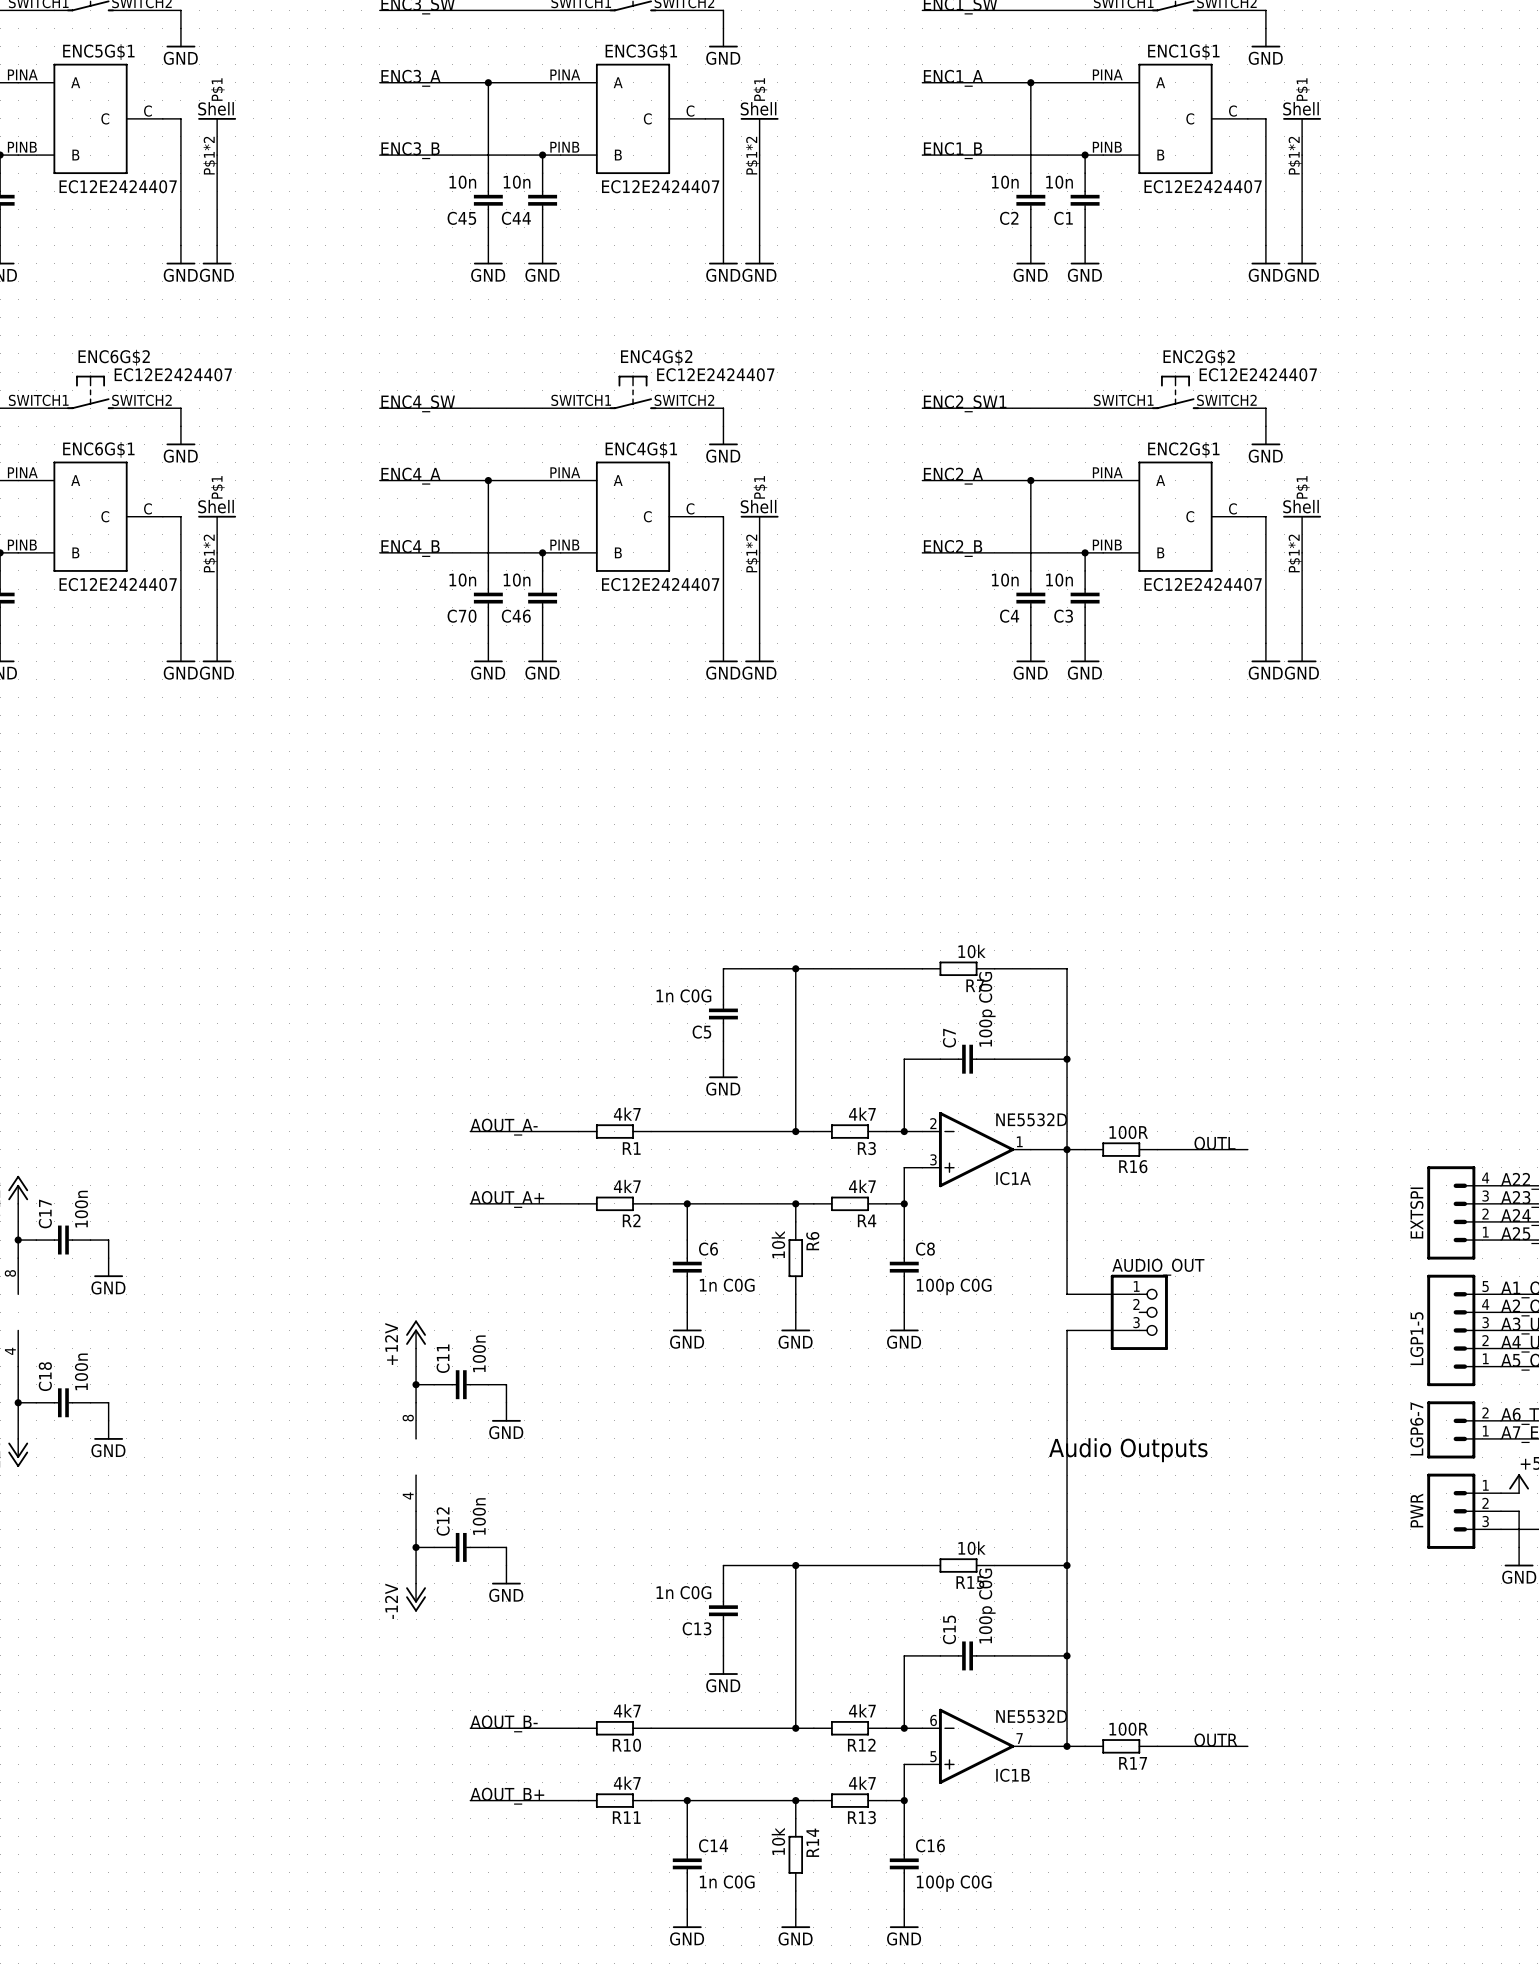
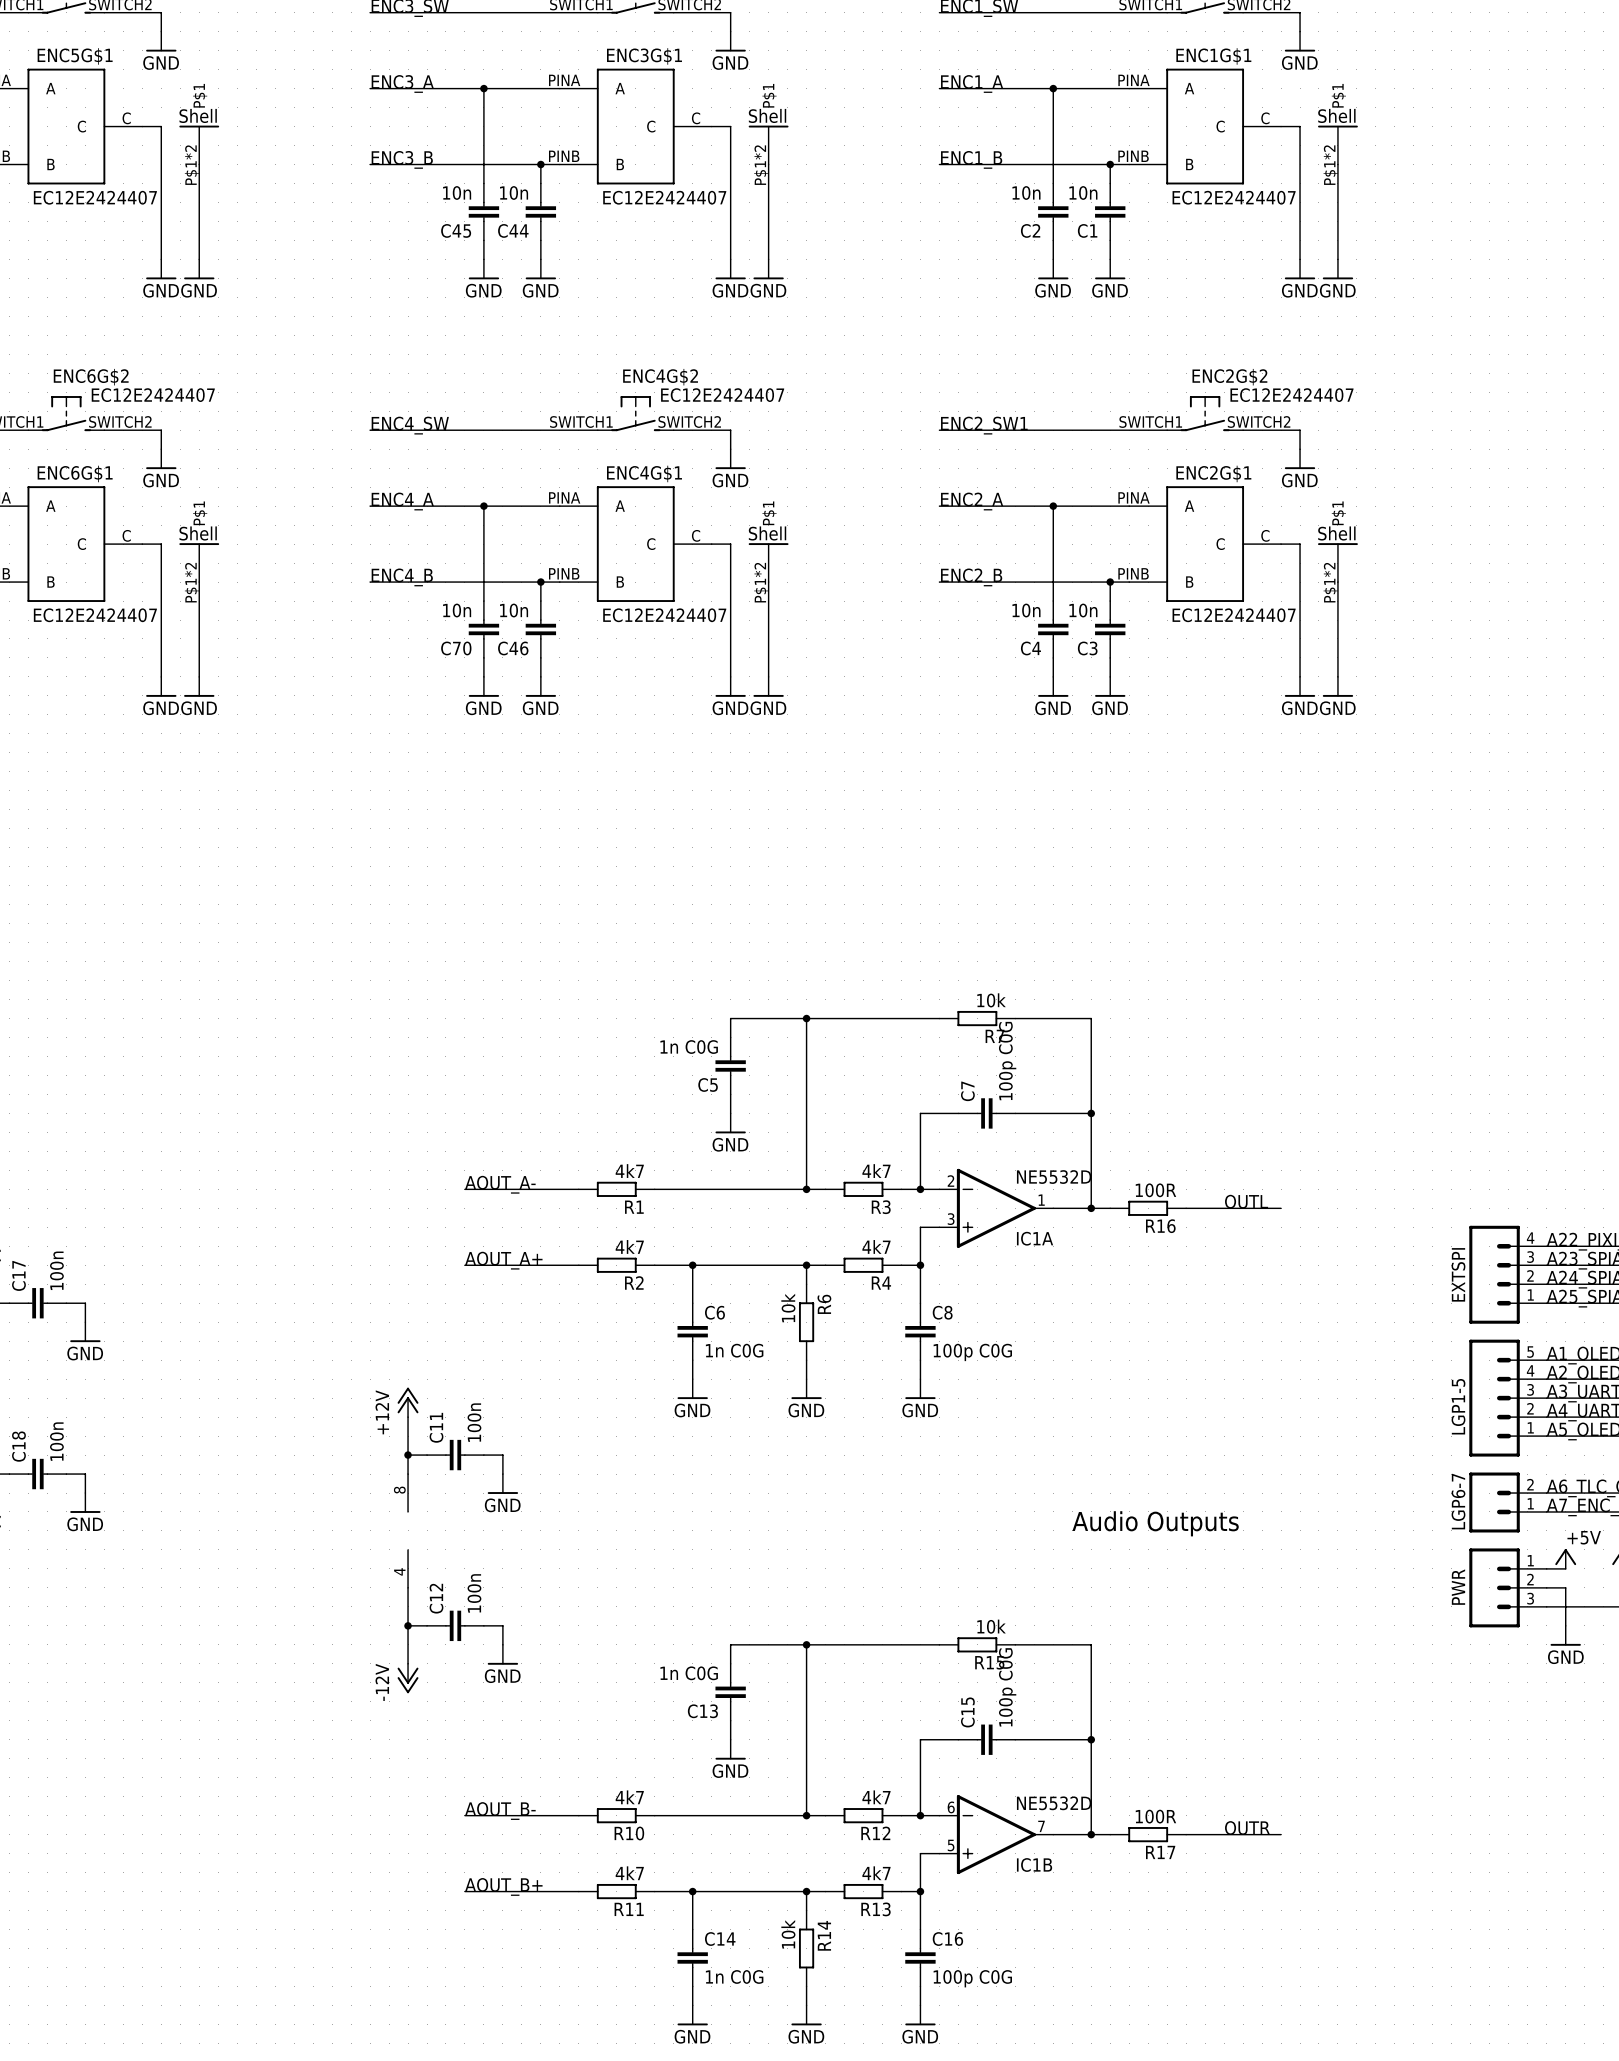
wire: (1067, 1149) (1067, 1294) (1139, 1294) -> none
AUDIO_OUT: (1139, 1312) -> none
wire: (1139, 1330) (1067, 1330) (1067, 1565) -> none
junction: (1067, 1565) -> none

